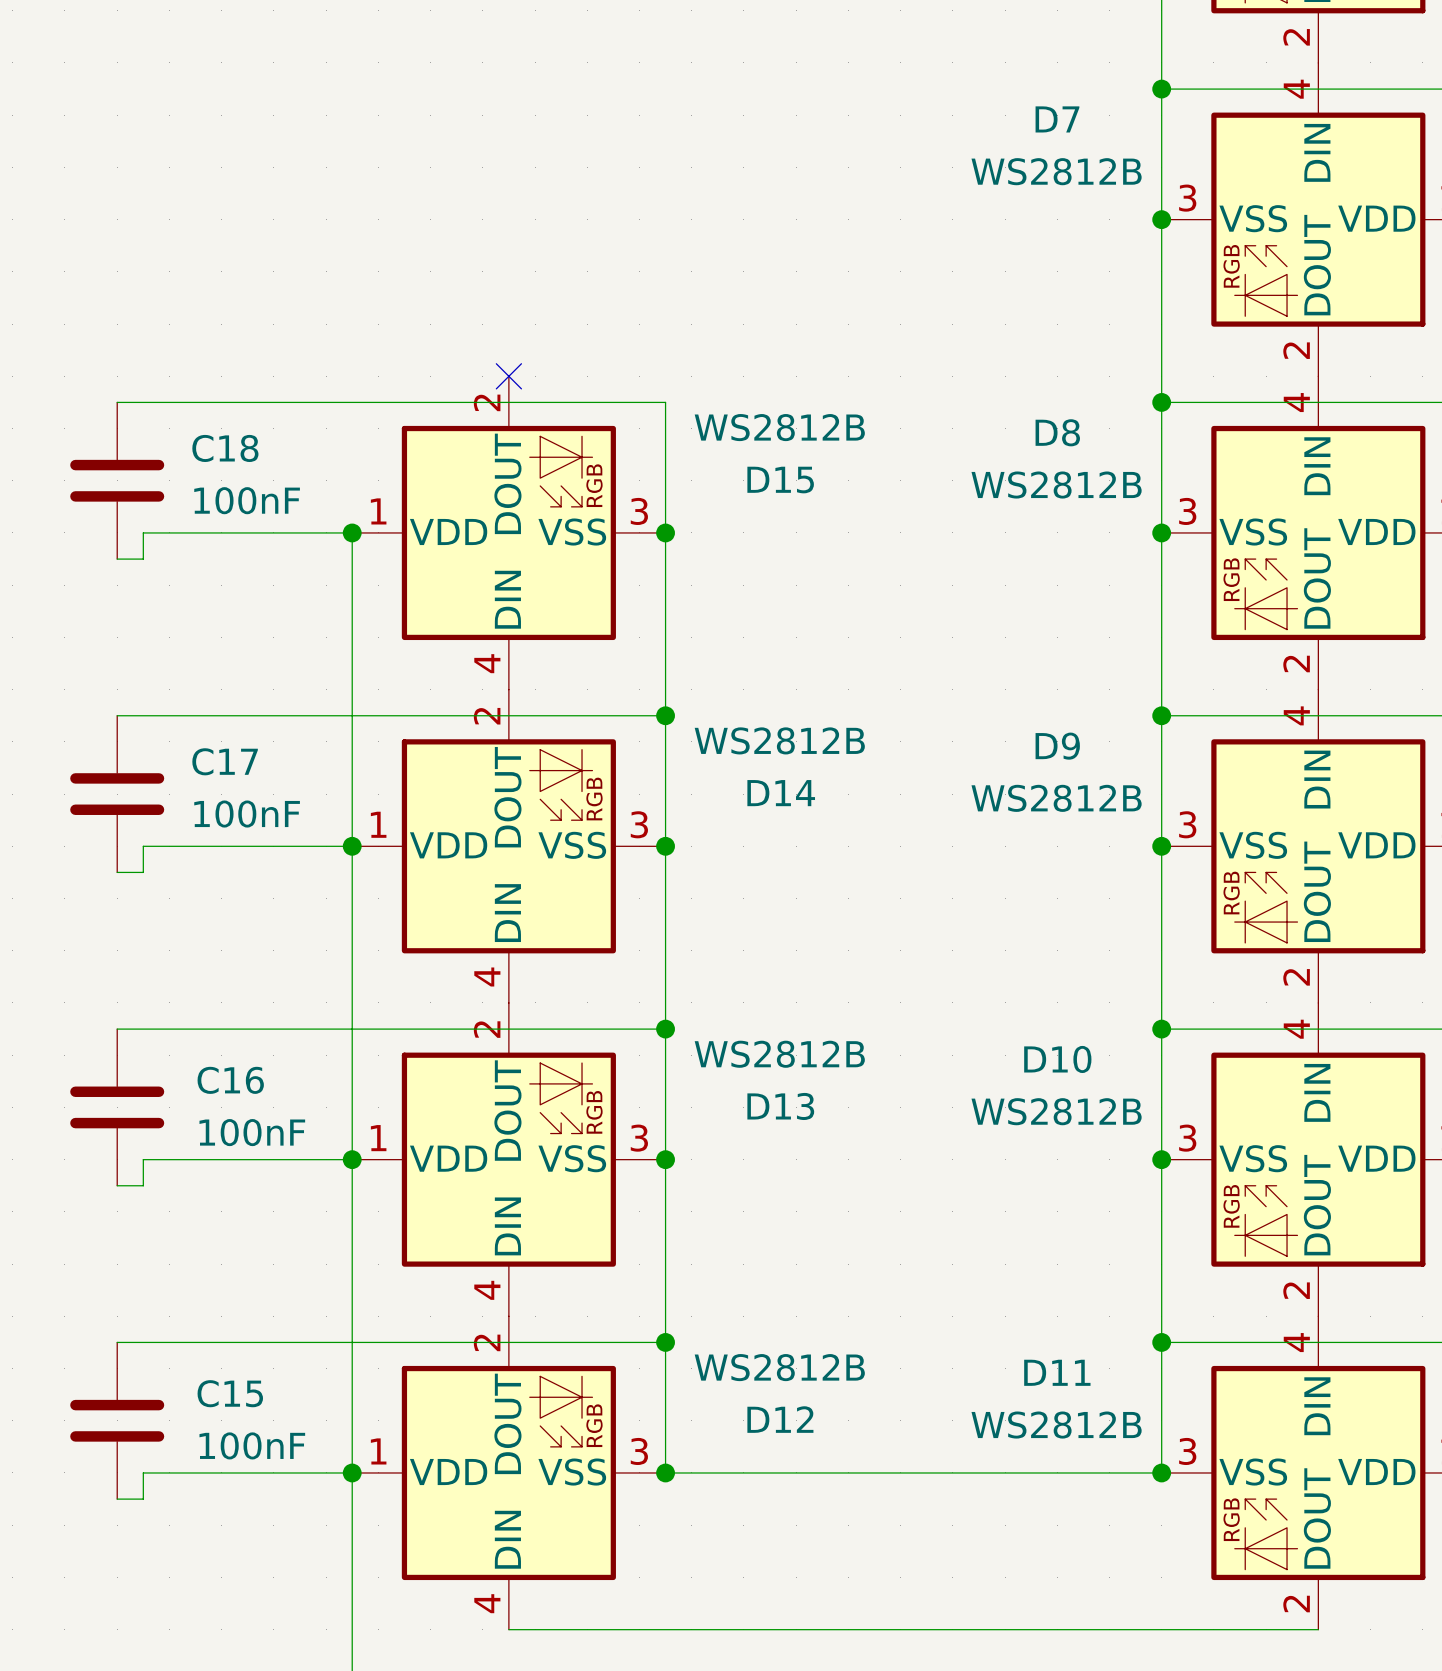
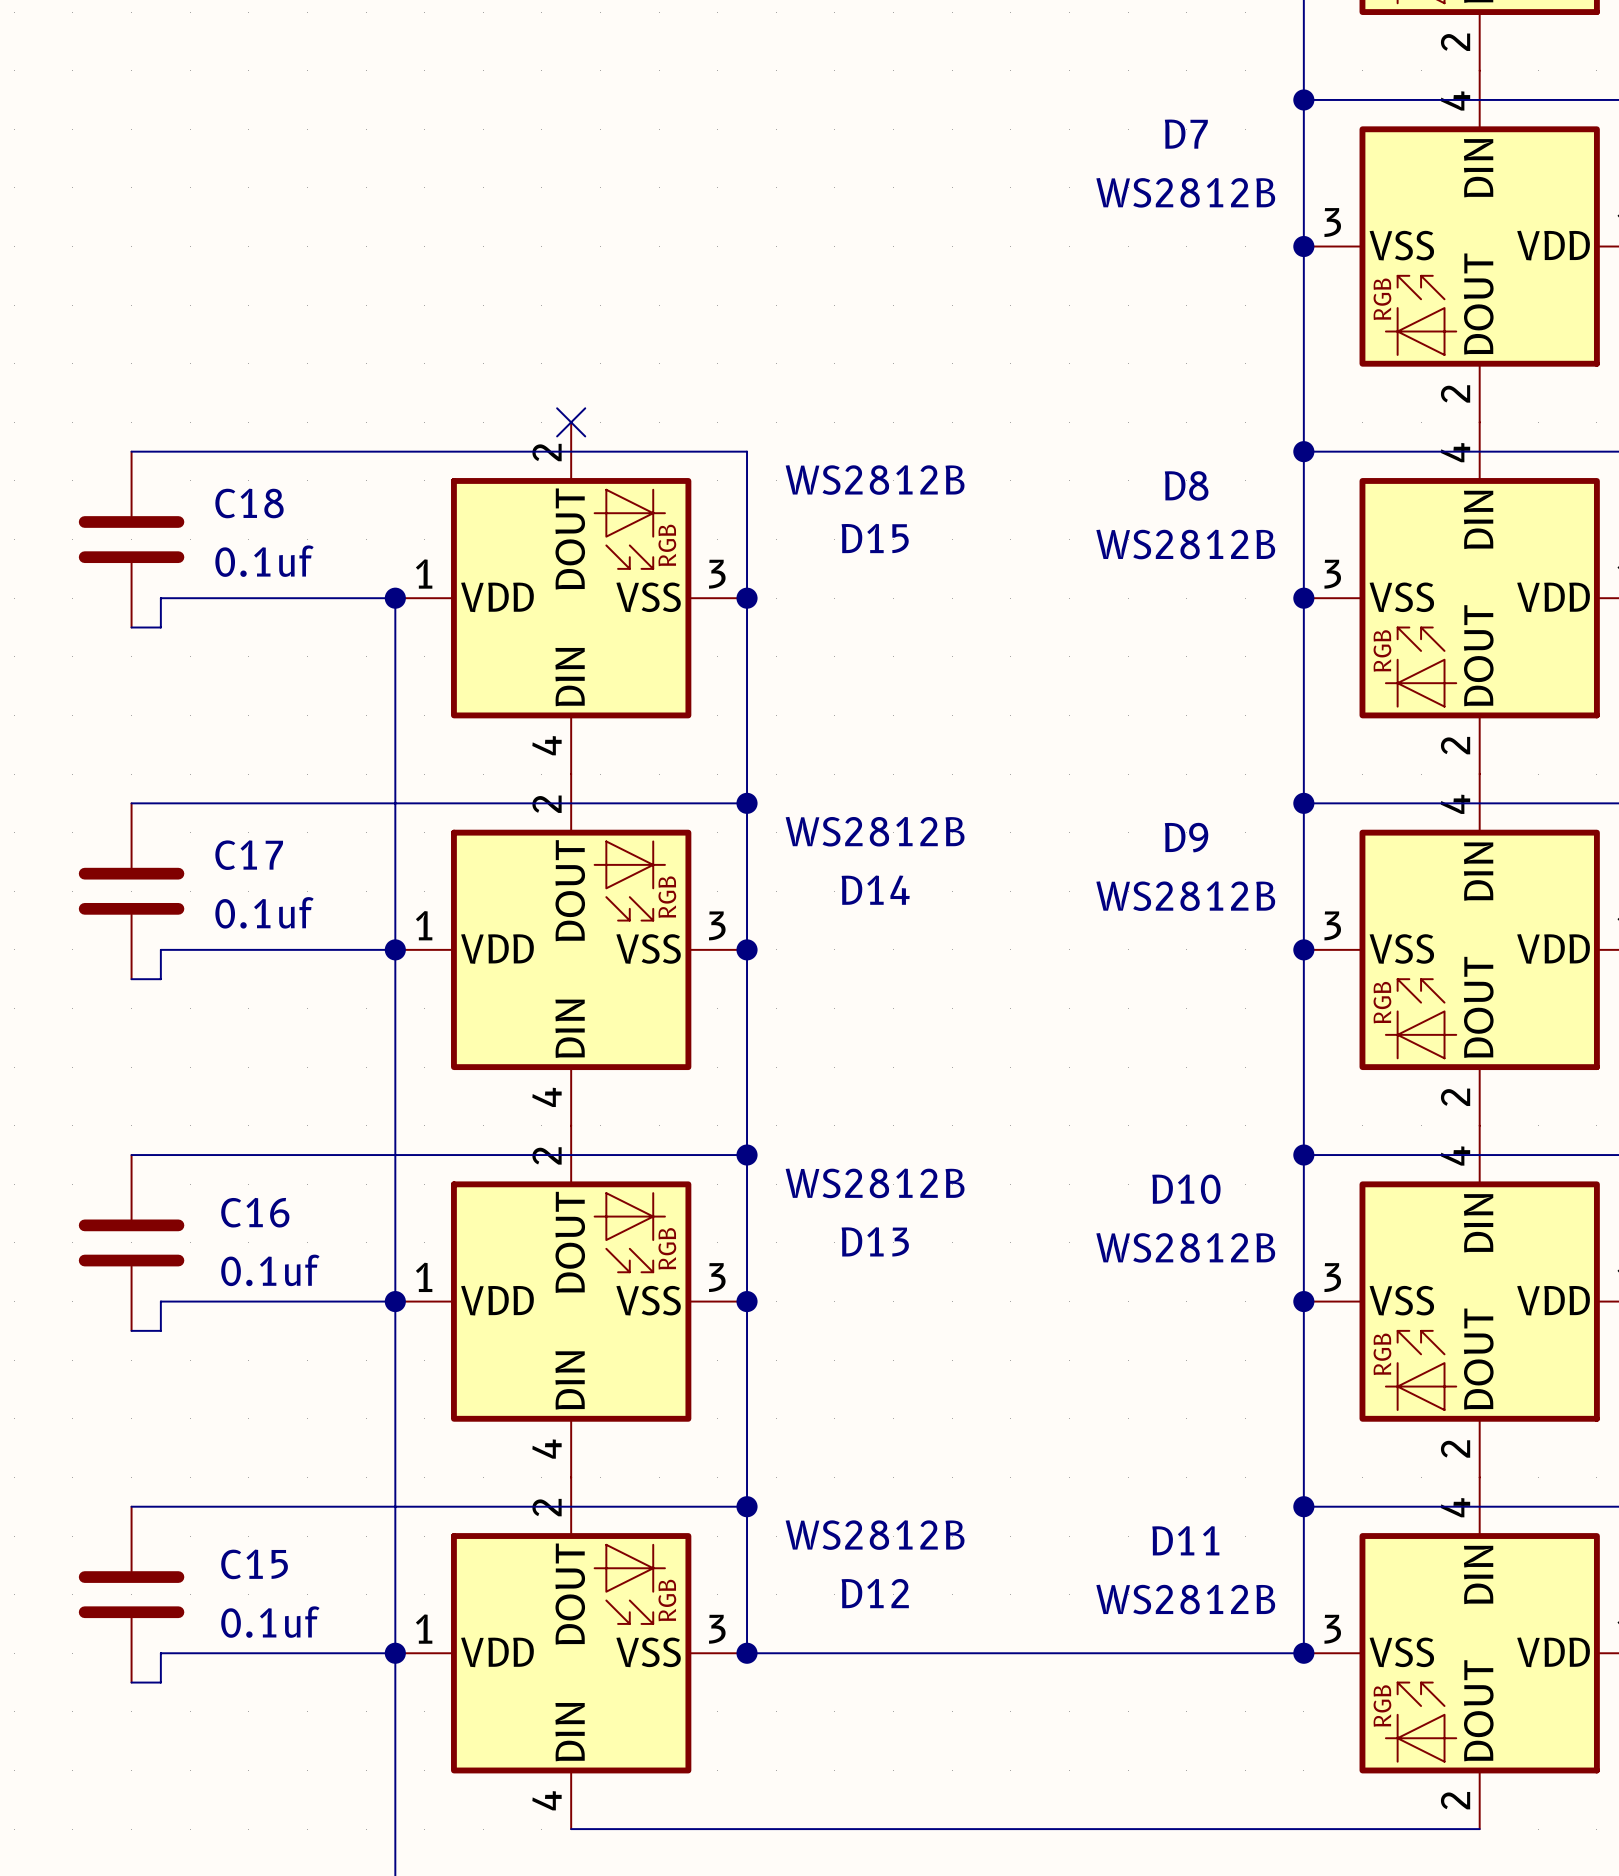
C18 value: 100nF (247, 500) -> 0.1uf (264, 561)
C17 value: 100nF (247, 814) -> 0.1uf (264, 912)
C16 value: 100nF (252, 1132) -> 0.1uf (270, 1270)
C15 value: 100nF (252, 1445) -> 0.1uf (270, 1622)

